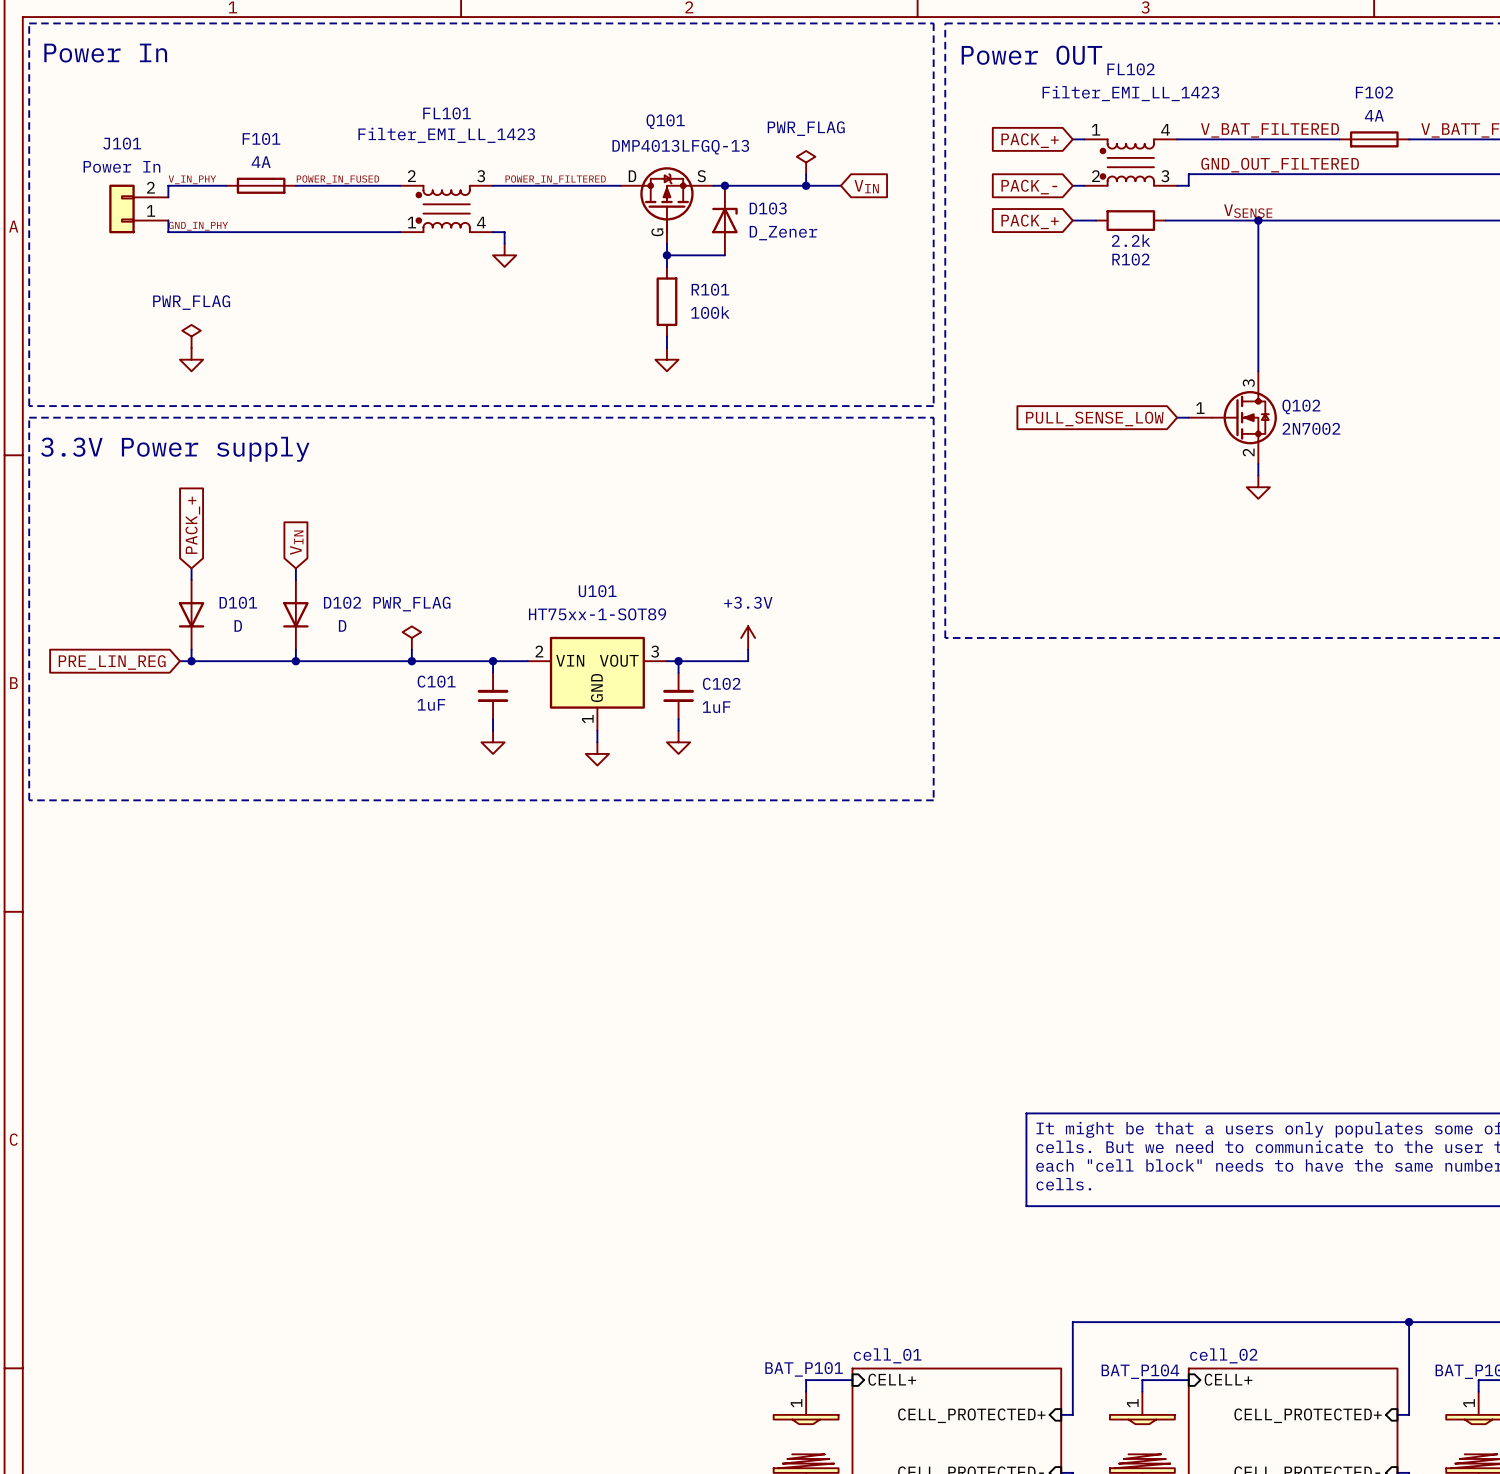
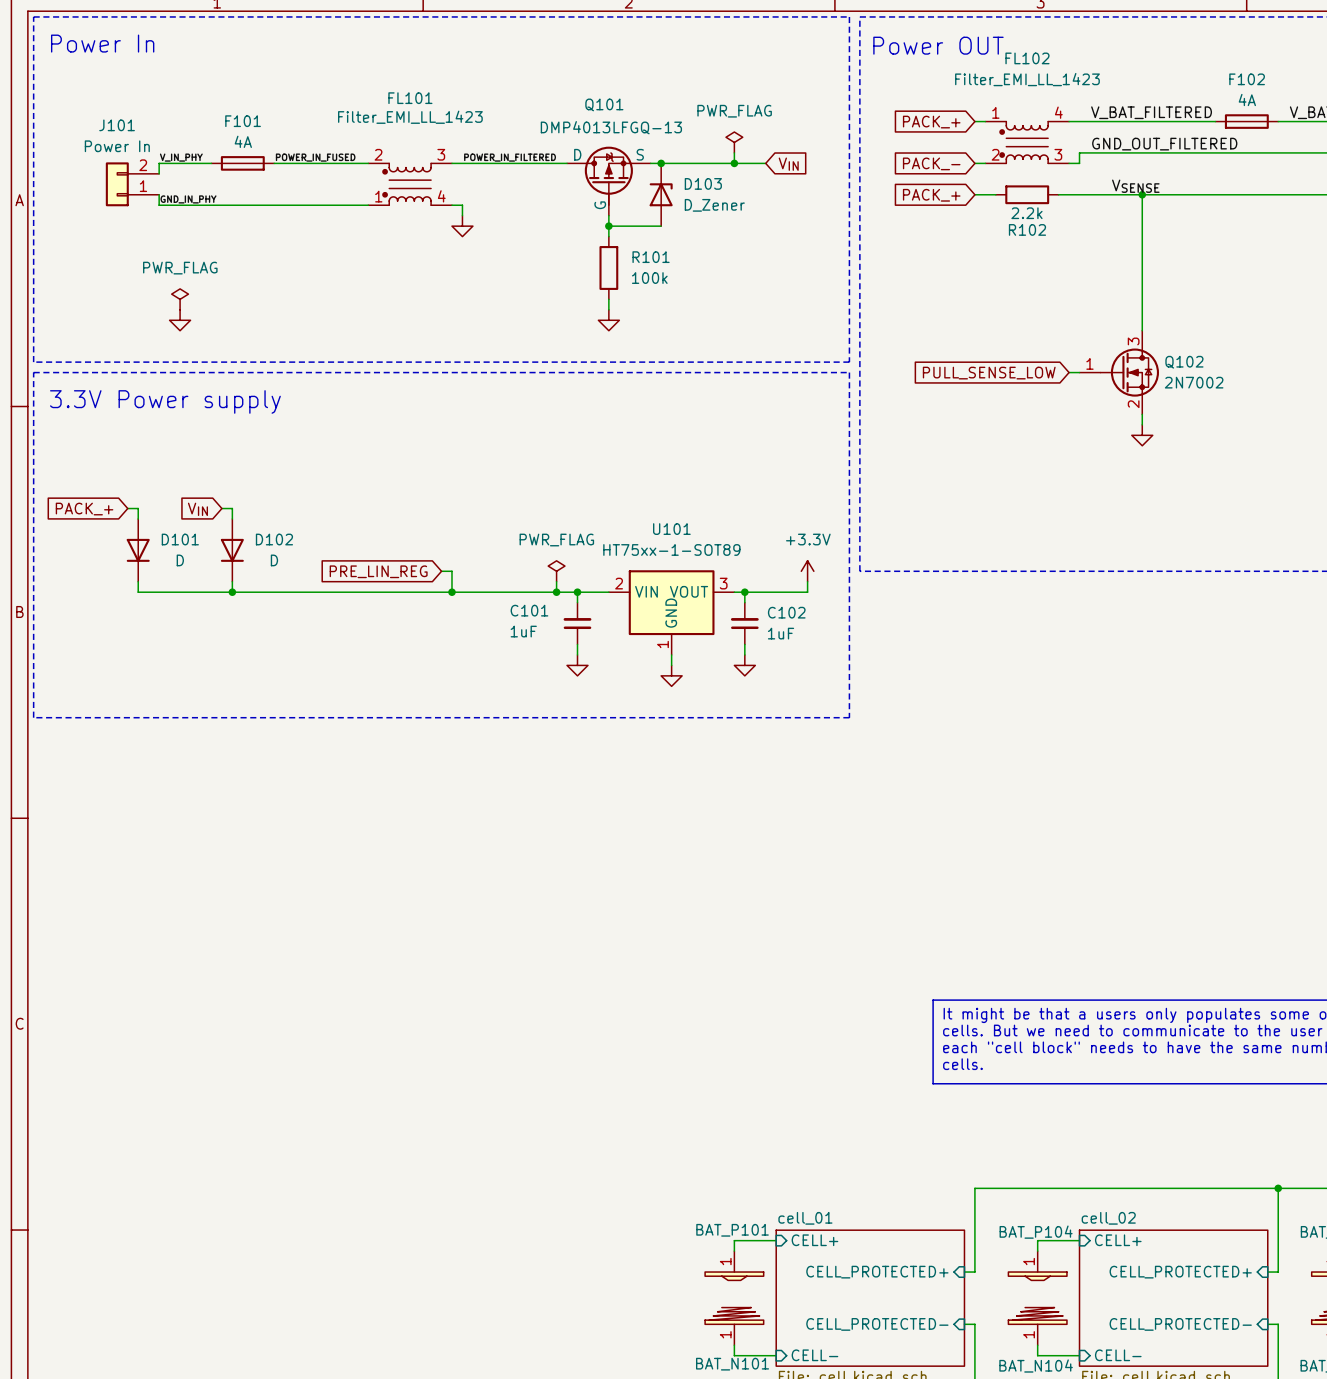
global label rotation: 0° (192, 525) -> 90° counterclockwise (84, 509)
global label position: PACK_+ (192, 525) -> PACK_+ (84, 509)
global label rotation: 0° (296, 542) -> 90° counterclockwise (197, 509)
global label position: VIN (296, 542) -> VIN (197, 509)
wire: none -> (127, 508) (138, 508) (138, 518)
wire: none -> (221, 508) (232, 508) (232, 518)
wire: (295, 568) (295, 580) -> none
D101 position: (191, 614) -> (138, 550)
D102 position: (295, 614) -> (232, 550)
power symbol position: PWR_FLAG (411, 637) -> PWR_FLAG (556, 571)
power symbol position: +3.3V (748, 637) -> +3.3V (807, 571)
global label: none -> PRE_LIN_REG (378, 571)
wire: none -> (138, 581) (138, 592) (169, 592)
wire: (191, 649) (191, 661) -> none
wire: (295, 649) (295, 661) -> (232, 581) (232, 592)
wire: none -> (807, 581) (807, 592) (734, 592)
junction: (191, 661) -> none
junction: none -> (232, 592)
junction: (295, 661) -> none
junction: (411, 661) -> none
wire: (493, 661) (493, 672) -> (451, 592) (451, 571) (441, 571)
junction: none -> (556, 592)
junction: none -> (577, 592)
wire: (678, 661) (678, 672) -> (744, 592) (744, 602)
junction: (678, 661) -> none
junction: none -> (744, 592)
global label: PRE_LIN_REG (112, 662) -> none
U101 position: (597, 683) -> (671, 612)
C101 position: (493, 695) -> (577, 623)
C102 position: (678, 695) -> (744, 623)
wire: (493, 719) (493, 730) -> (577, 644) (577, 654)
wire: (678, 719) (678, 730) -> (744, 644) (744, 654)
wire: (597, 730) (597, 742) -> (671, 654) (671, 665)
power symbol: (493, 742) -> none
power symbol: none -> (577, 665)
power symbol: (678, 742) -> none
power symbol: none -> (744, 665)
power symbol: (597, 753) -> none
power symbol: none -> (671, 675)

